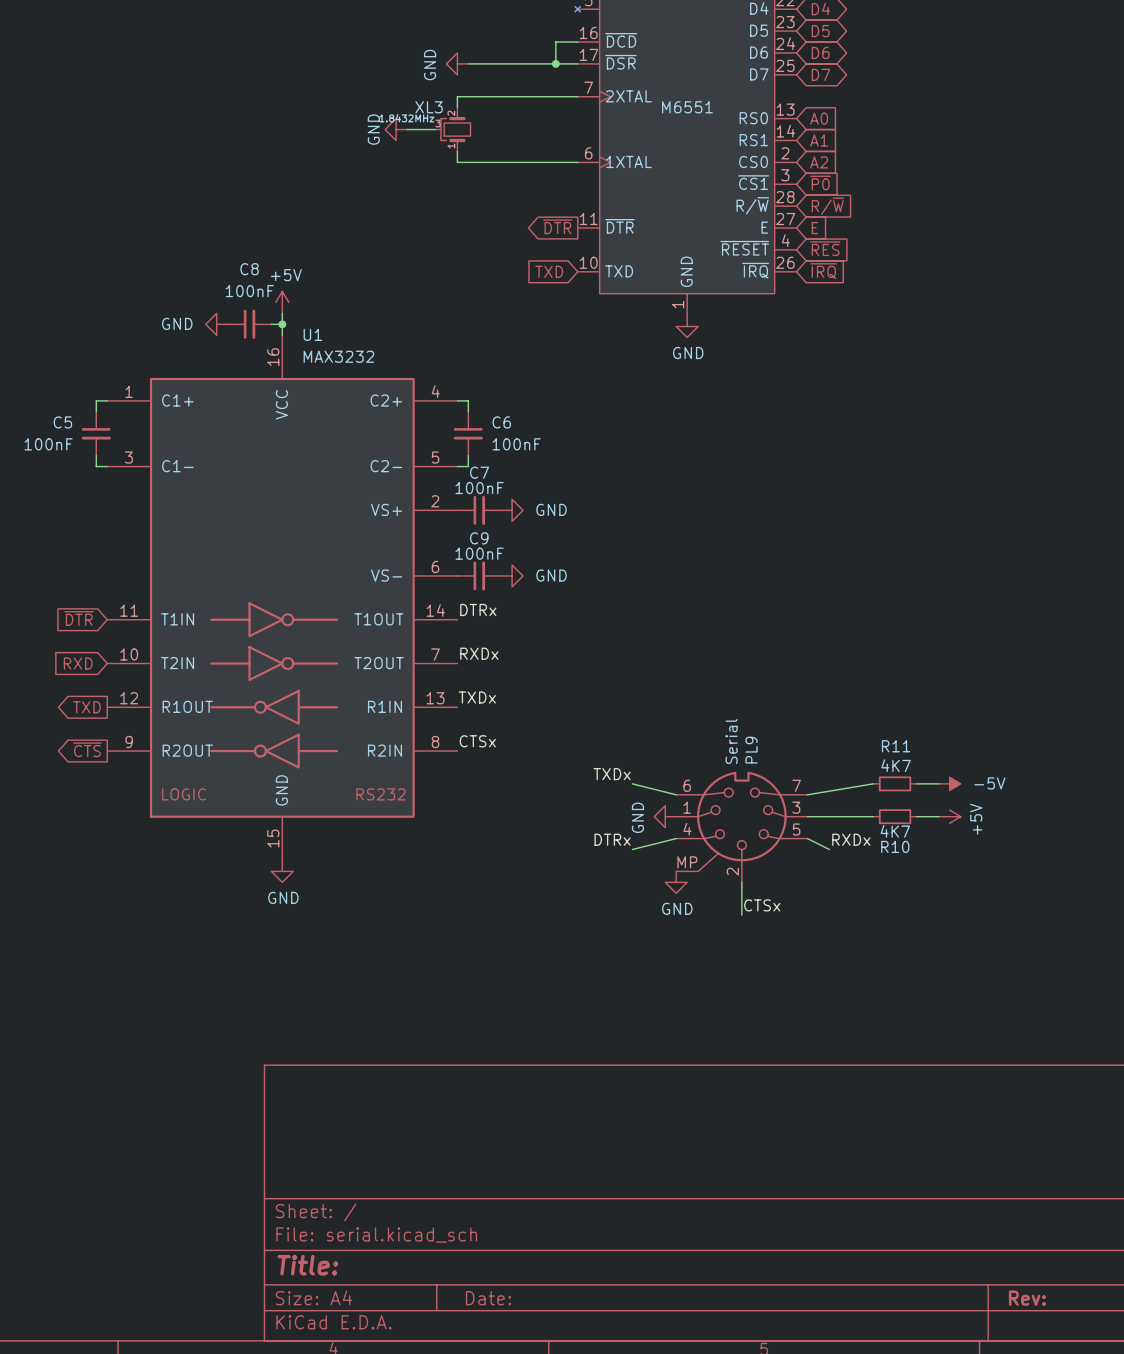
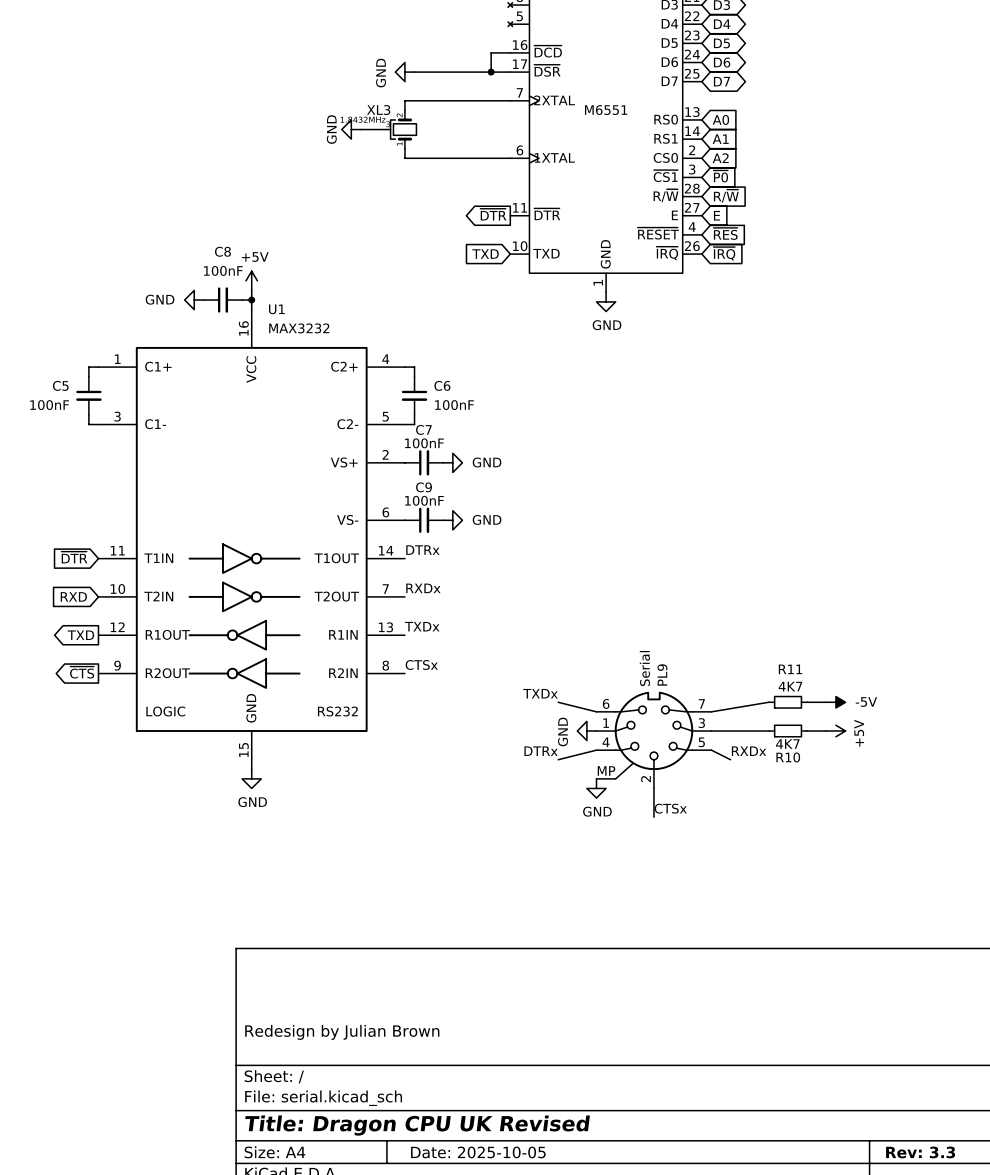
title block: none -> Redesign by Julian Brown (342, 1032)
title block: Title: (307, 1265) -> Title: Dragon CPU UK Revised (417, 1125)
title block: Date: (488, 1298) -> Date: 2025-10-05 (478, 1152)
title block: Rev: (1027, 1298) -> Rev: 3.3 (920, 1152)

